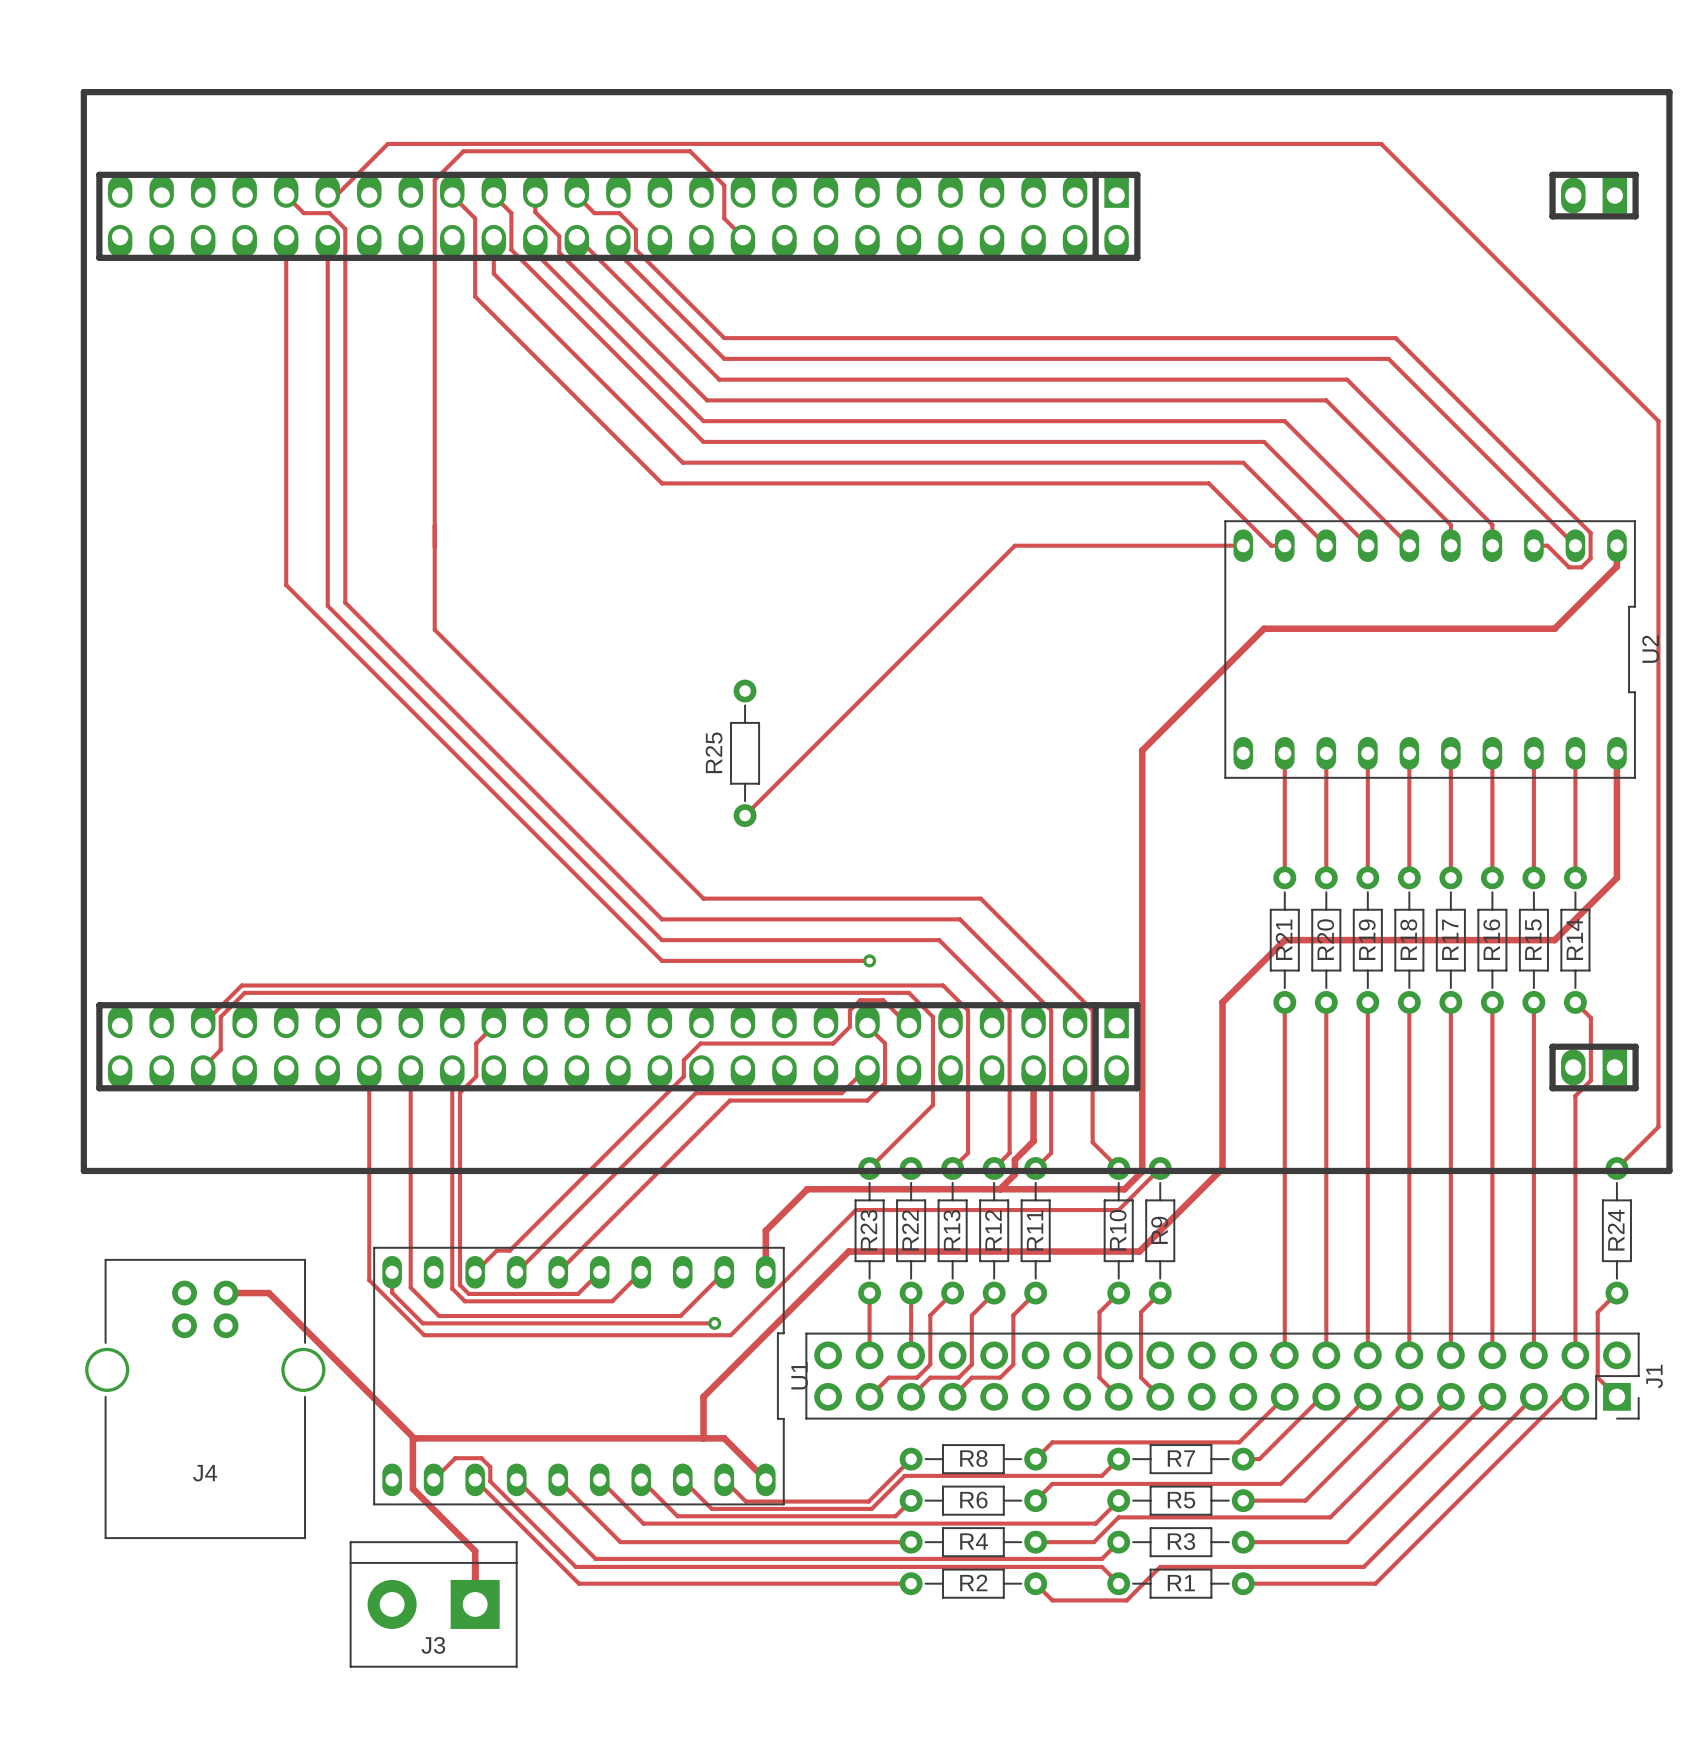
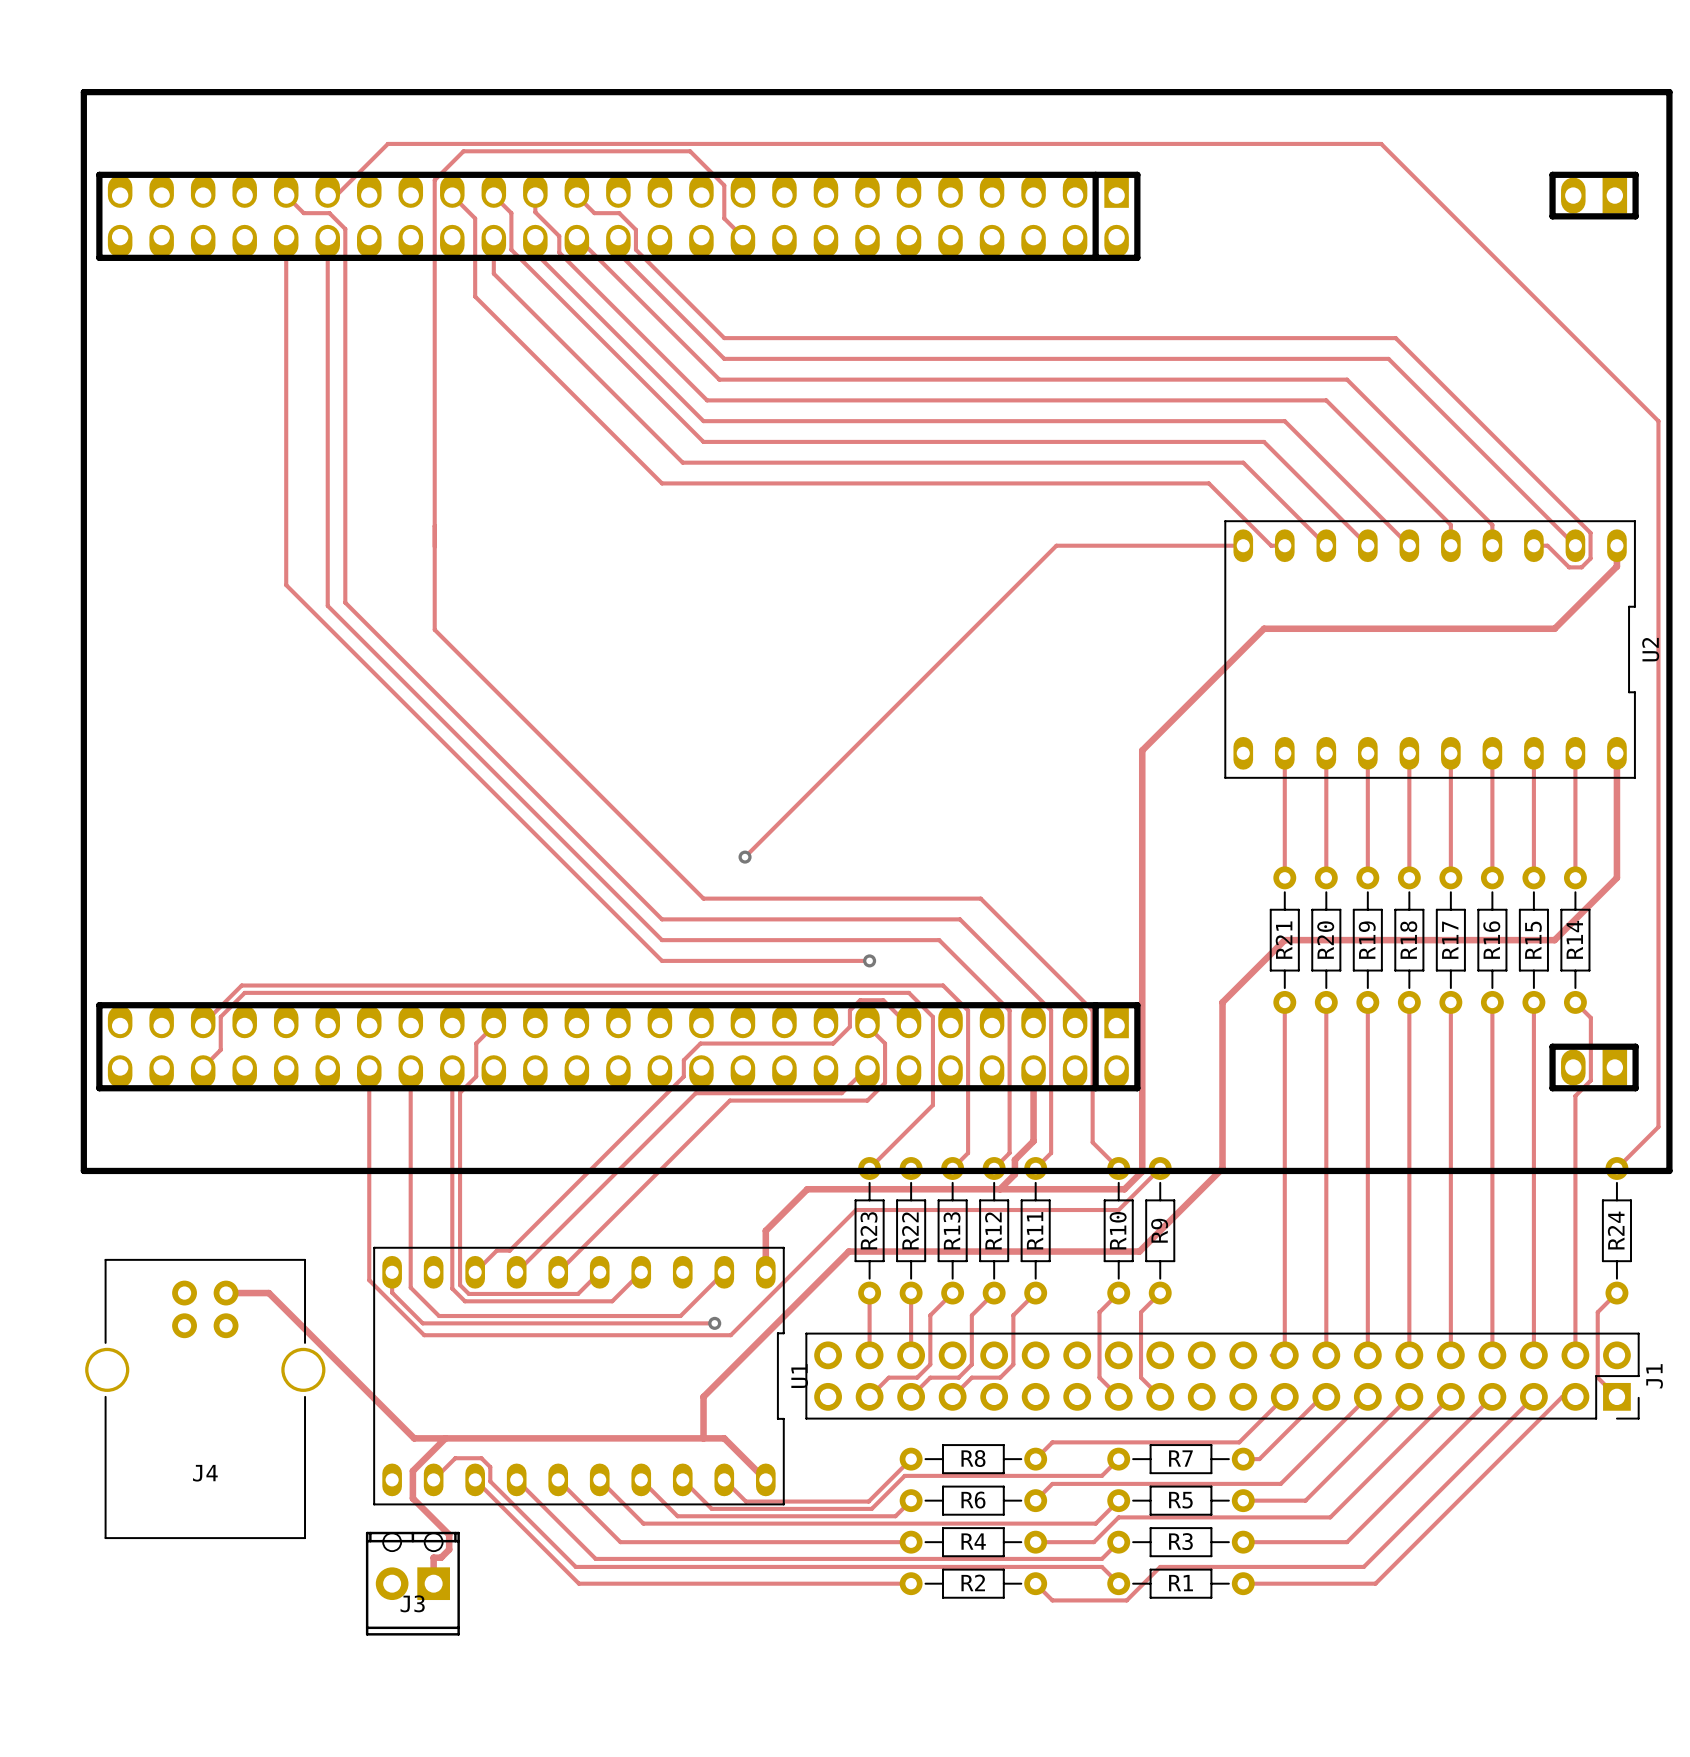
track: (1056, 545) (1014, 545) (745, 815) -> (1056, 545) (745, 857)
R25: (745, 753) -> none
via: none -> (745, 857)
track: (414, 1438) (412, 1470) -> (445, 1438) (412, 1470)
track: (412, 1488) (475, 1551) (475, 1604) -> (412, 1488) (412, 1498) (449, 1534) (449, 1549) (441, 1557) (433, 1557) (433, 1583)
J3 footprint: [349, 1541, 518, 1668] -> [365, 1531, 460, 1636]

